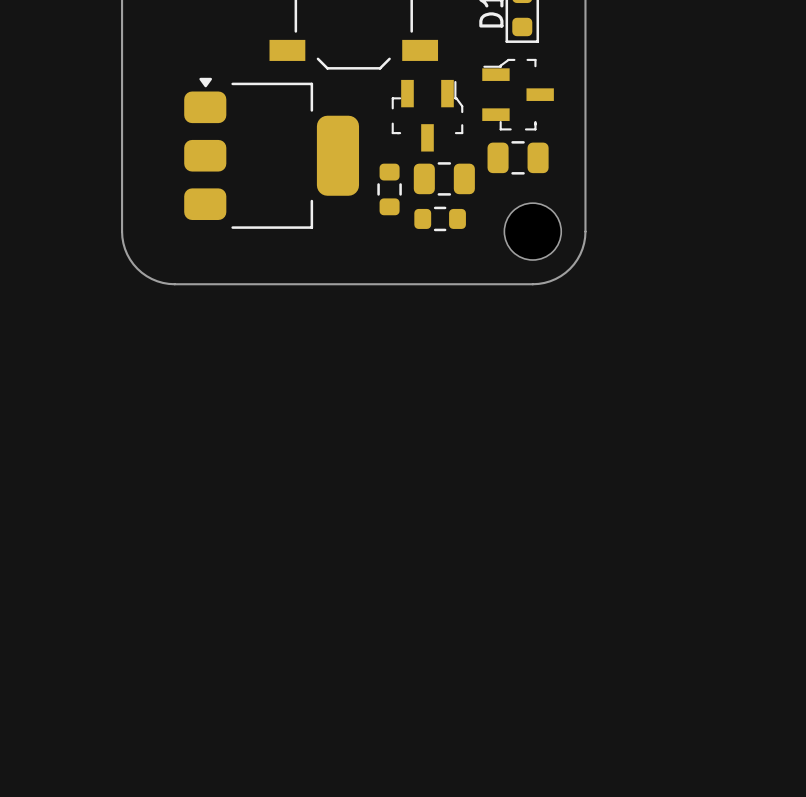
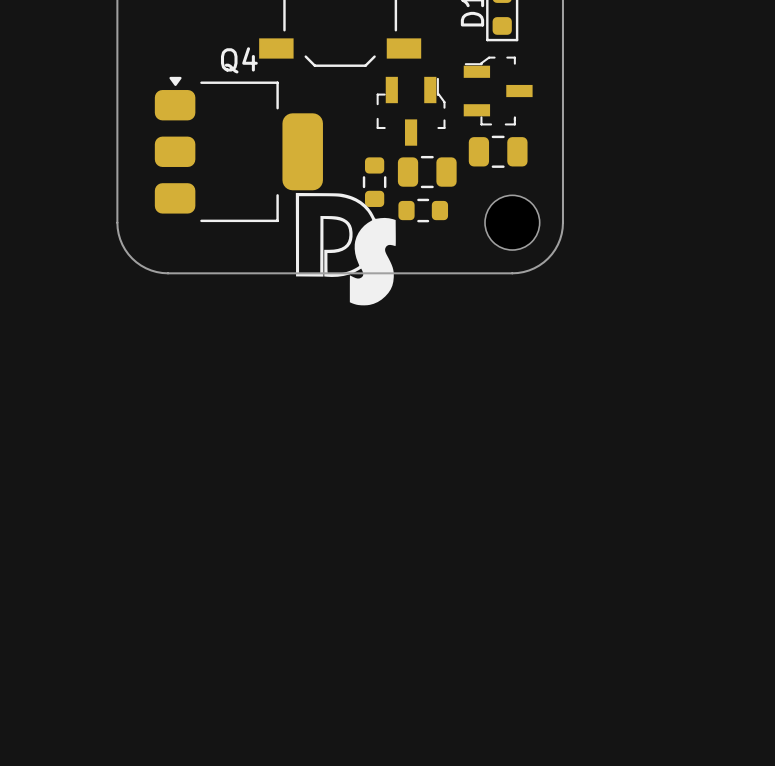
part: (271, 153) -> none
Q4: none -> (238, 149)
drawing: none -> [295, 192, 396, 306]

